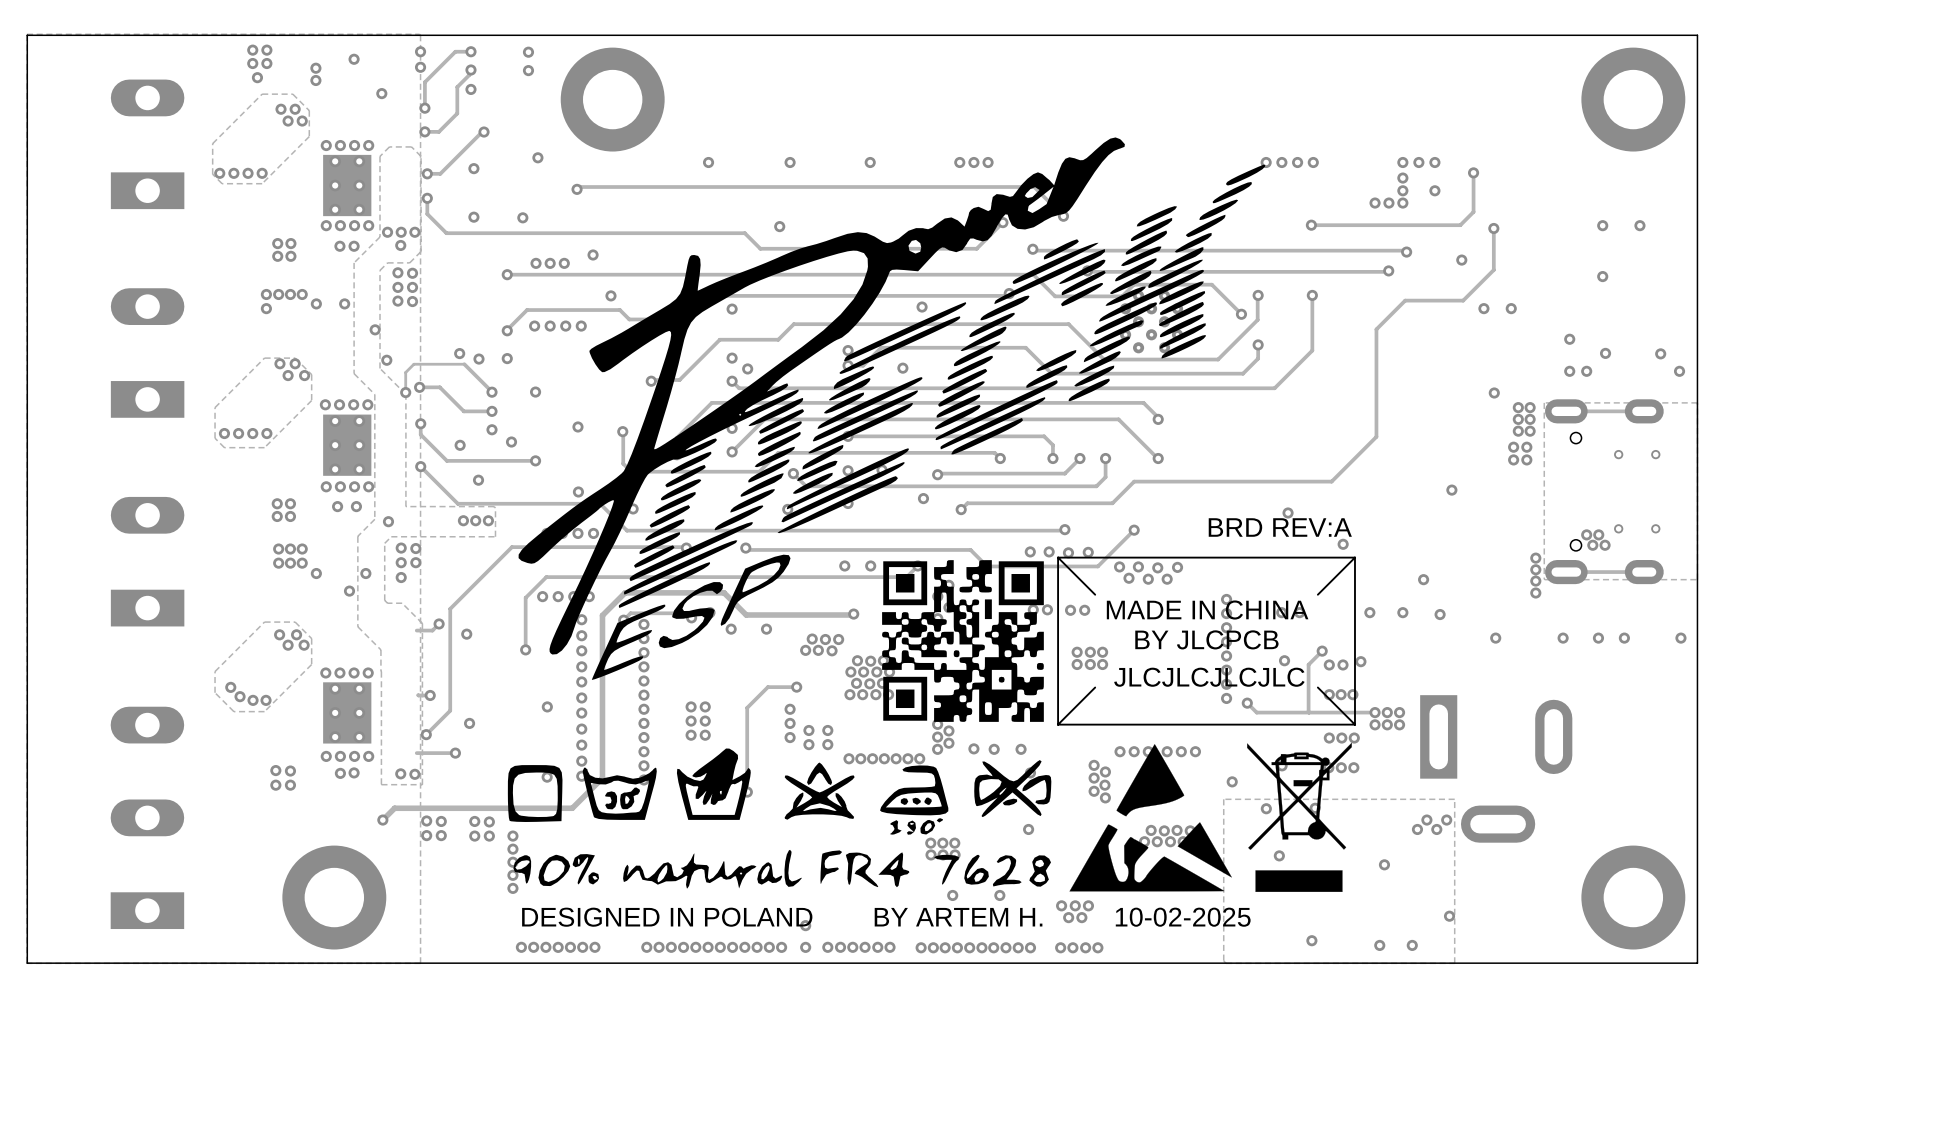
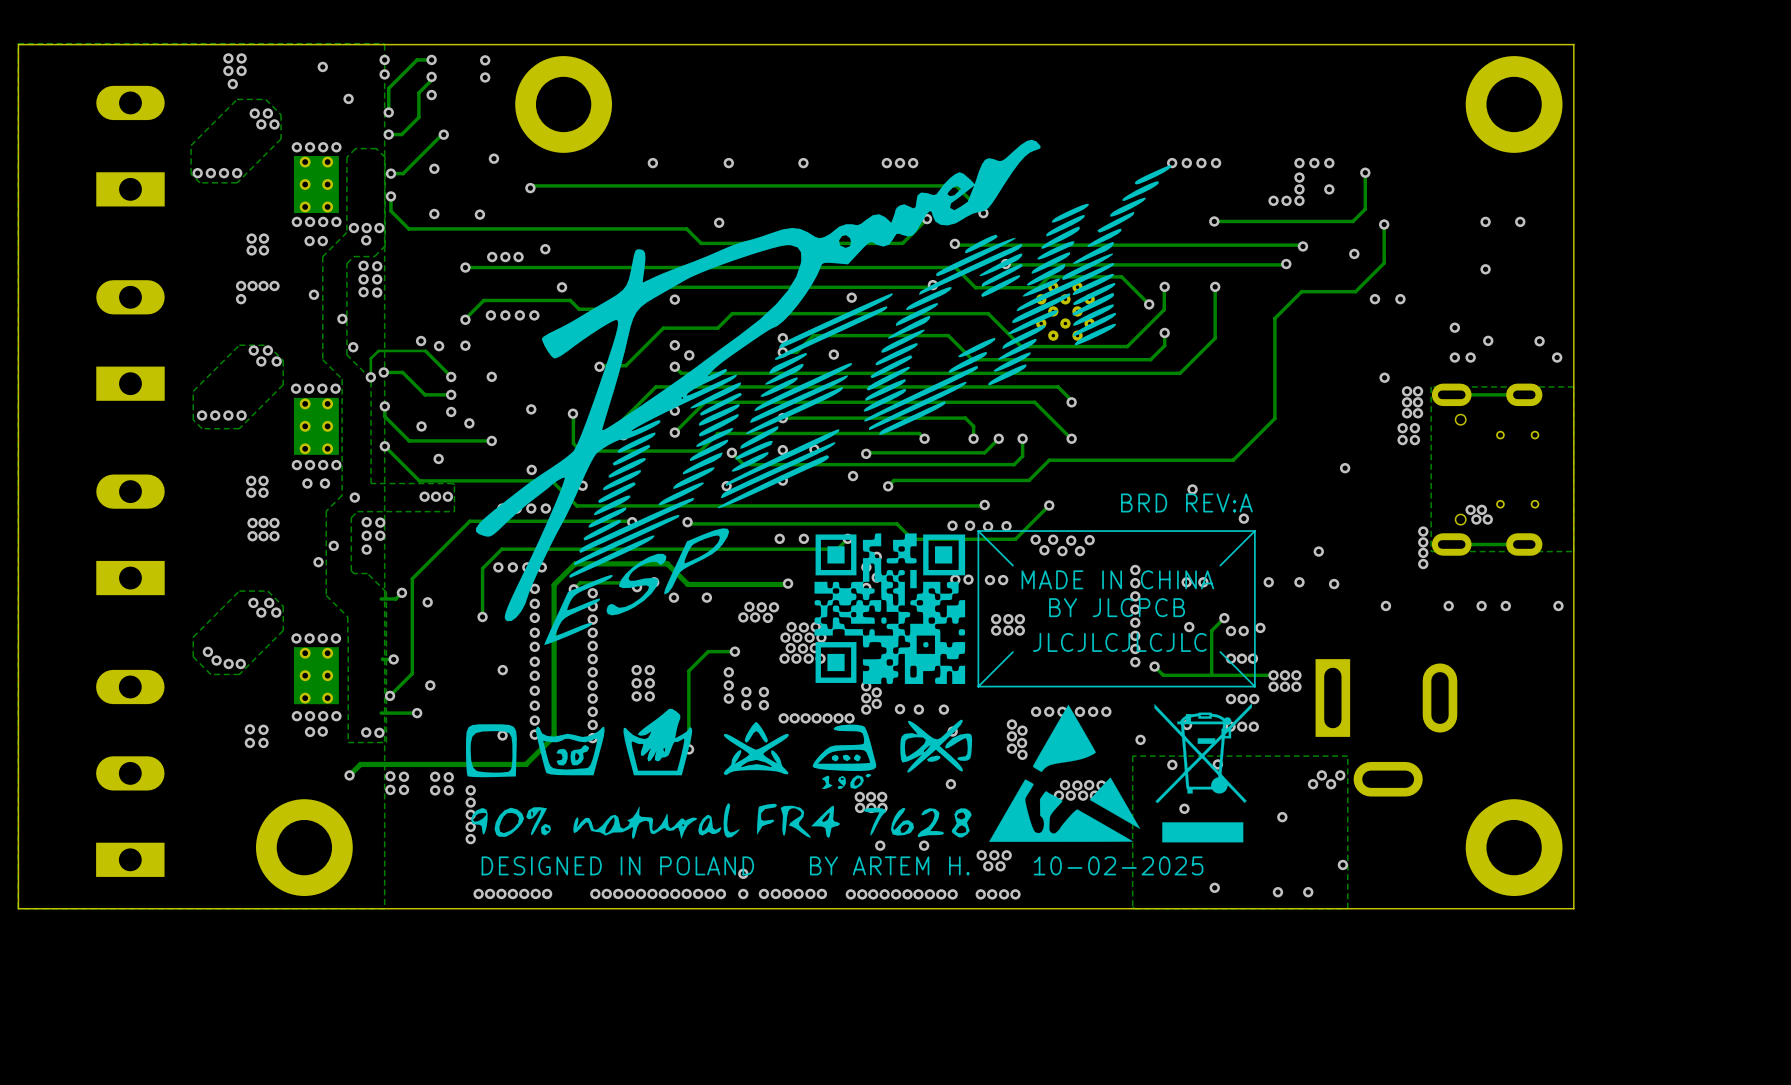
via: (315, 68) -> none
via: (315, 80) -> none
via: (316, 303) -> none
via: (316, 573) -> none

